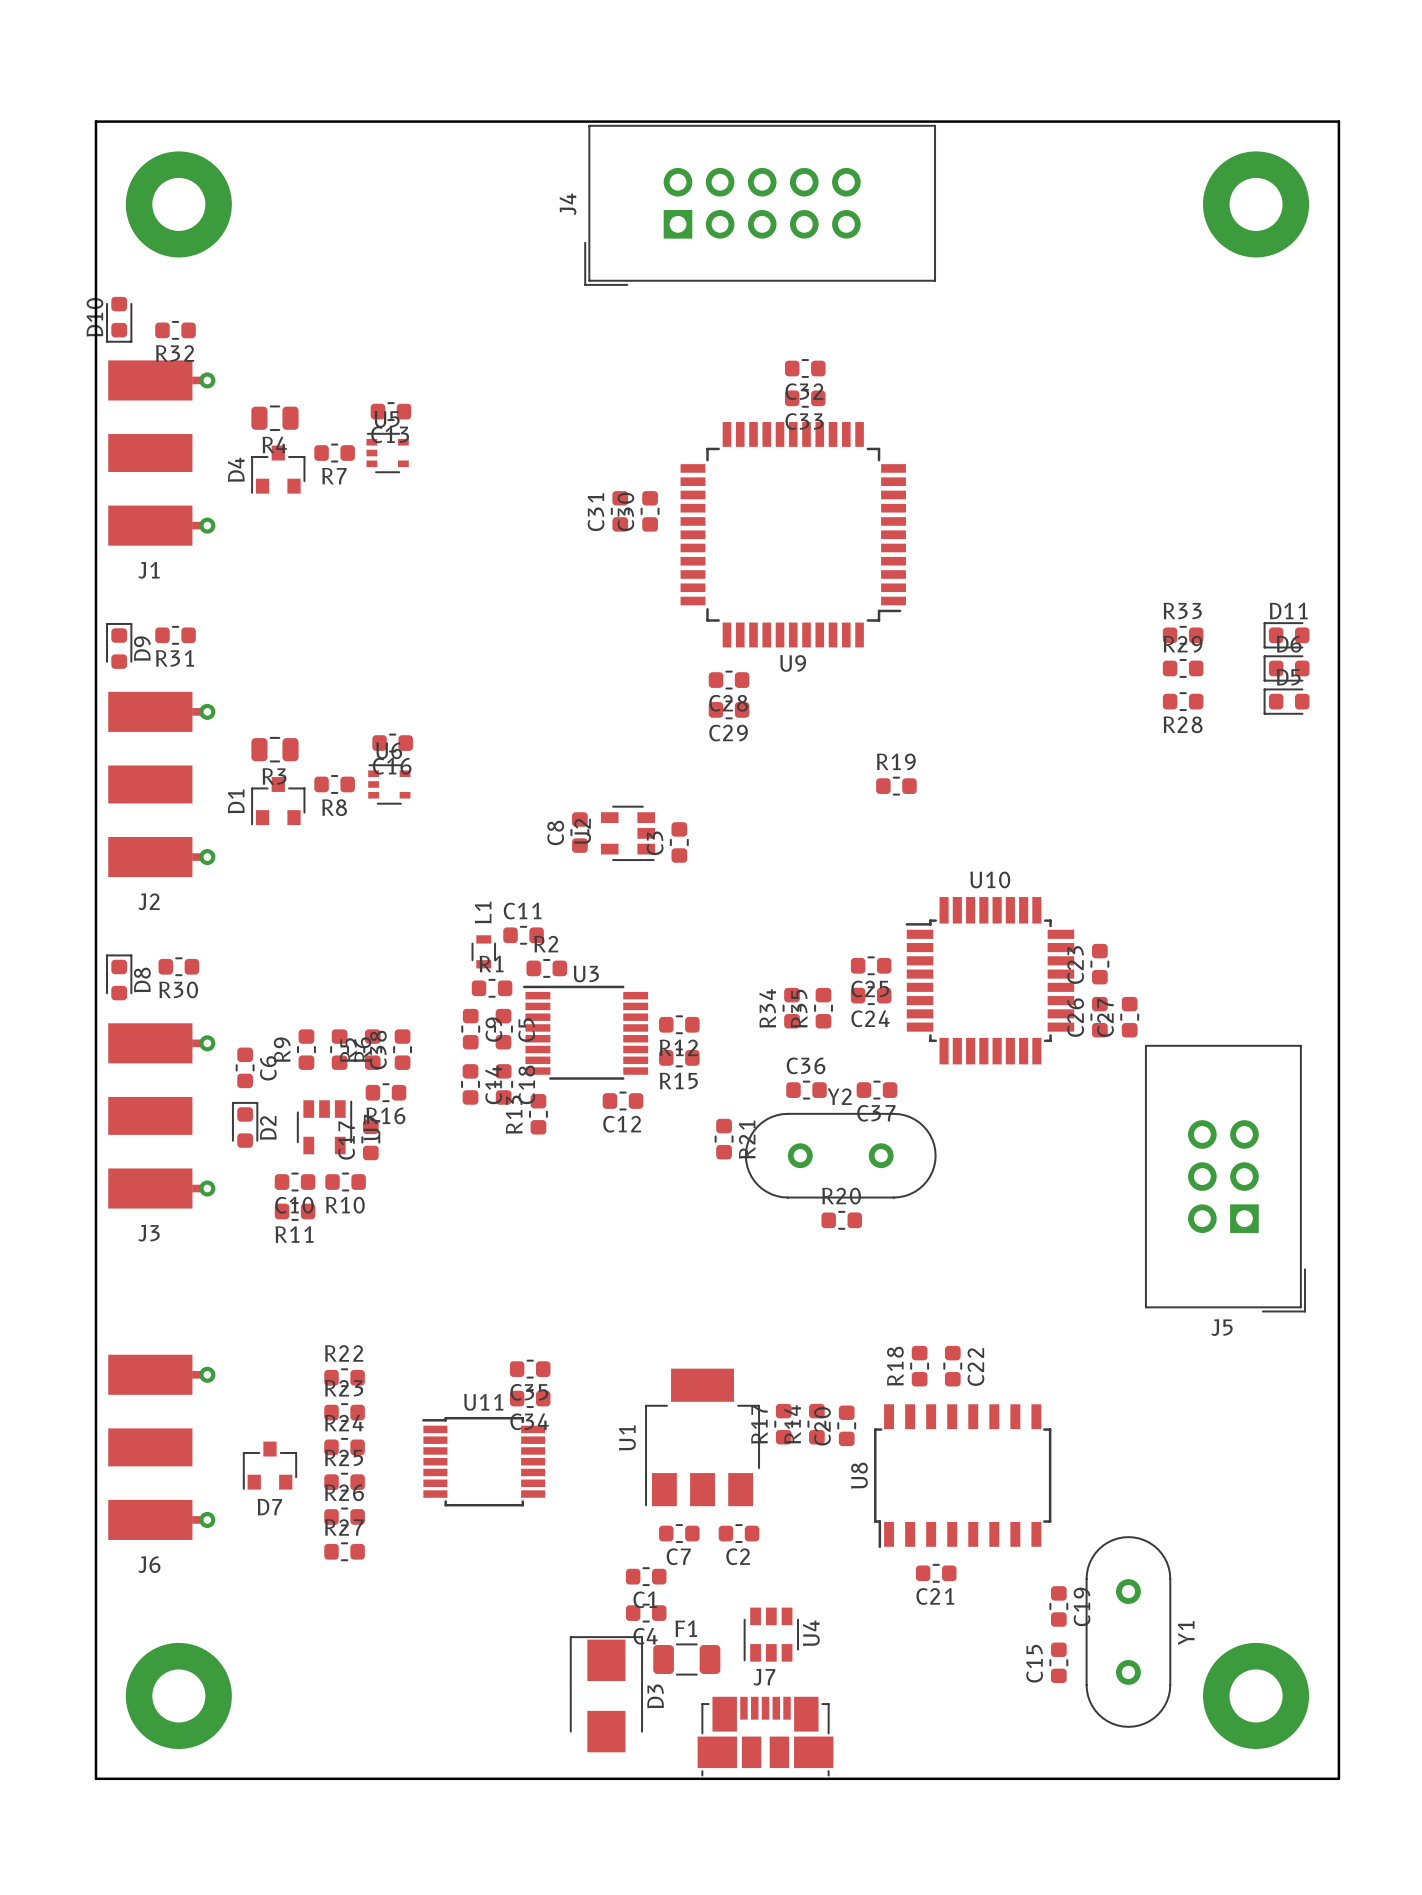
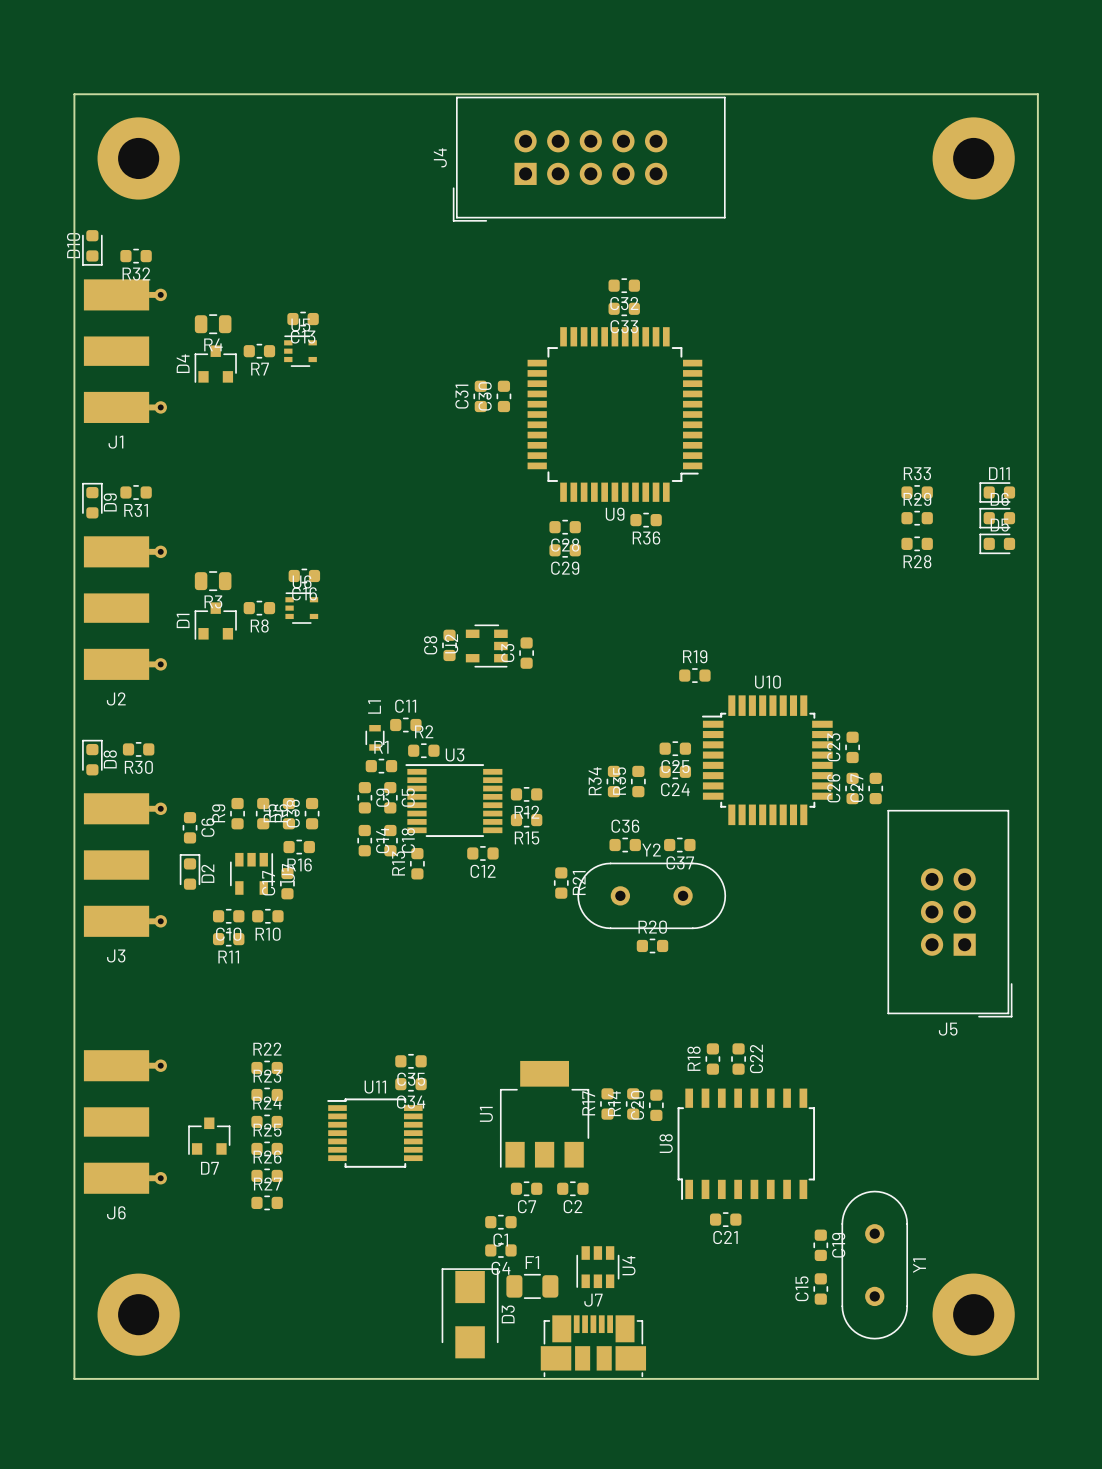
R36: none -> (646, 520)
R19 position: (896, 786) -> (694, 675)

